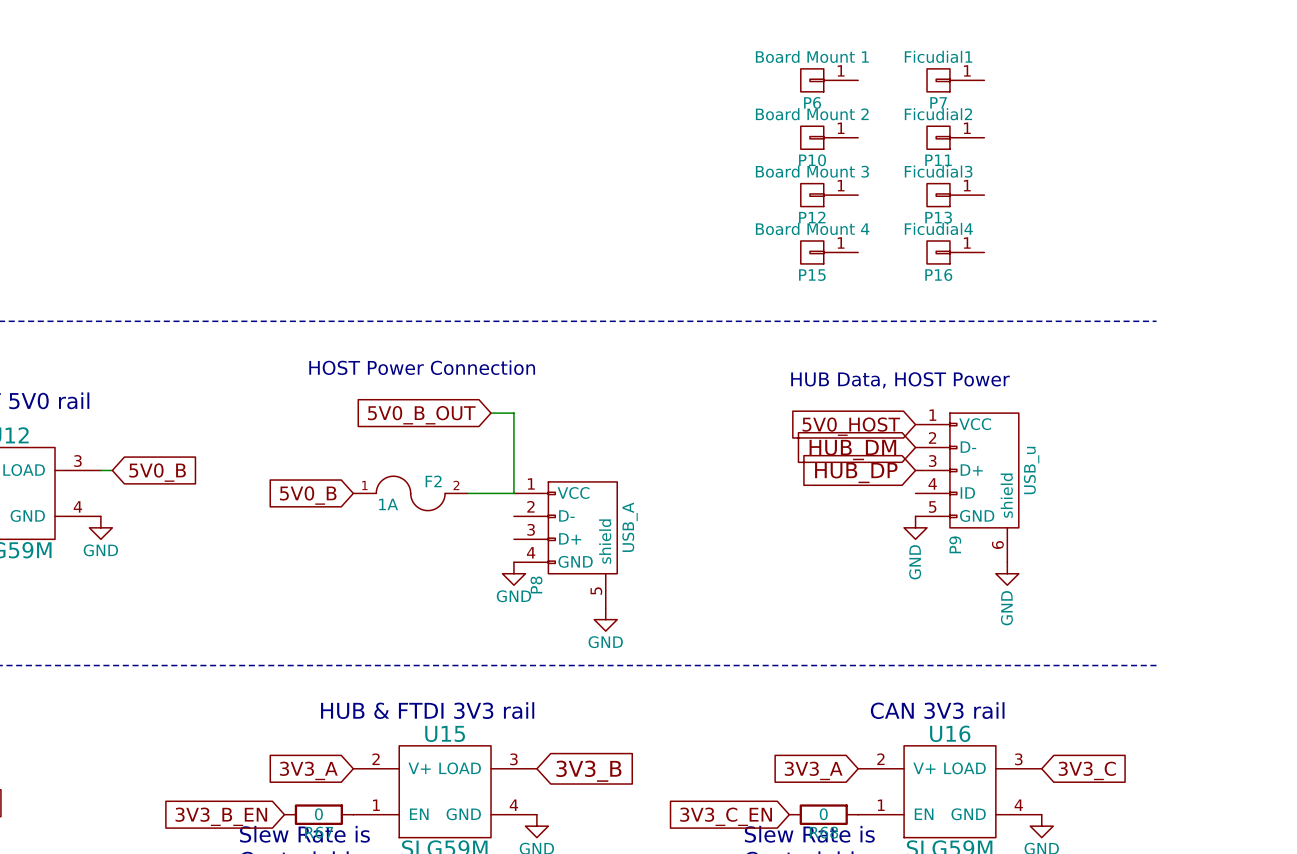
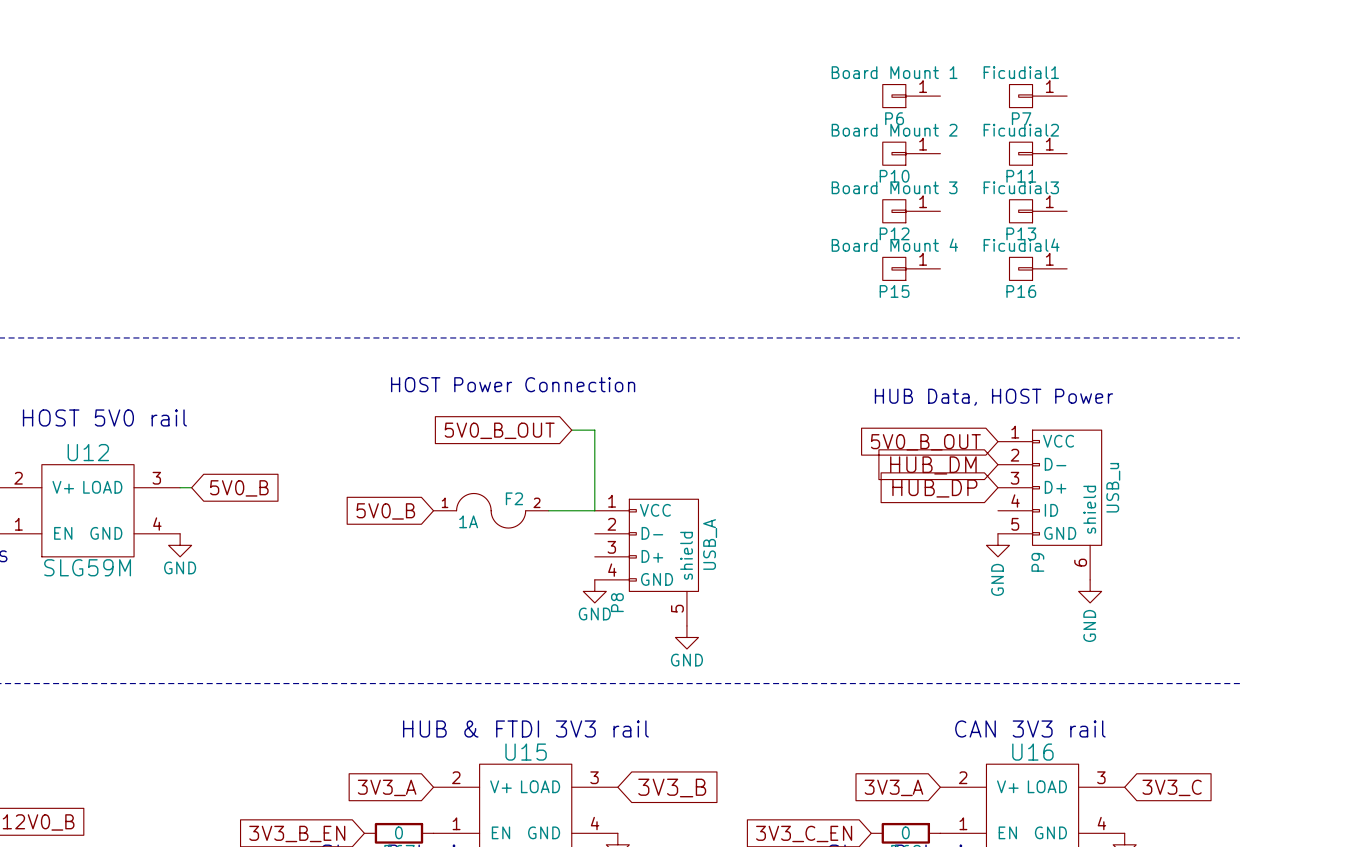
global label: 5V0_HOST (851, 426) -> 5V0_B_OUT (925, 442)

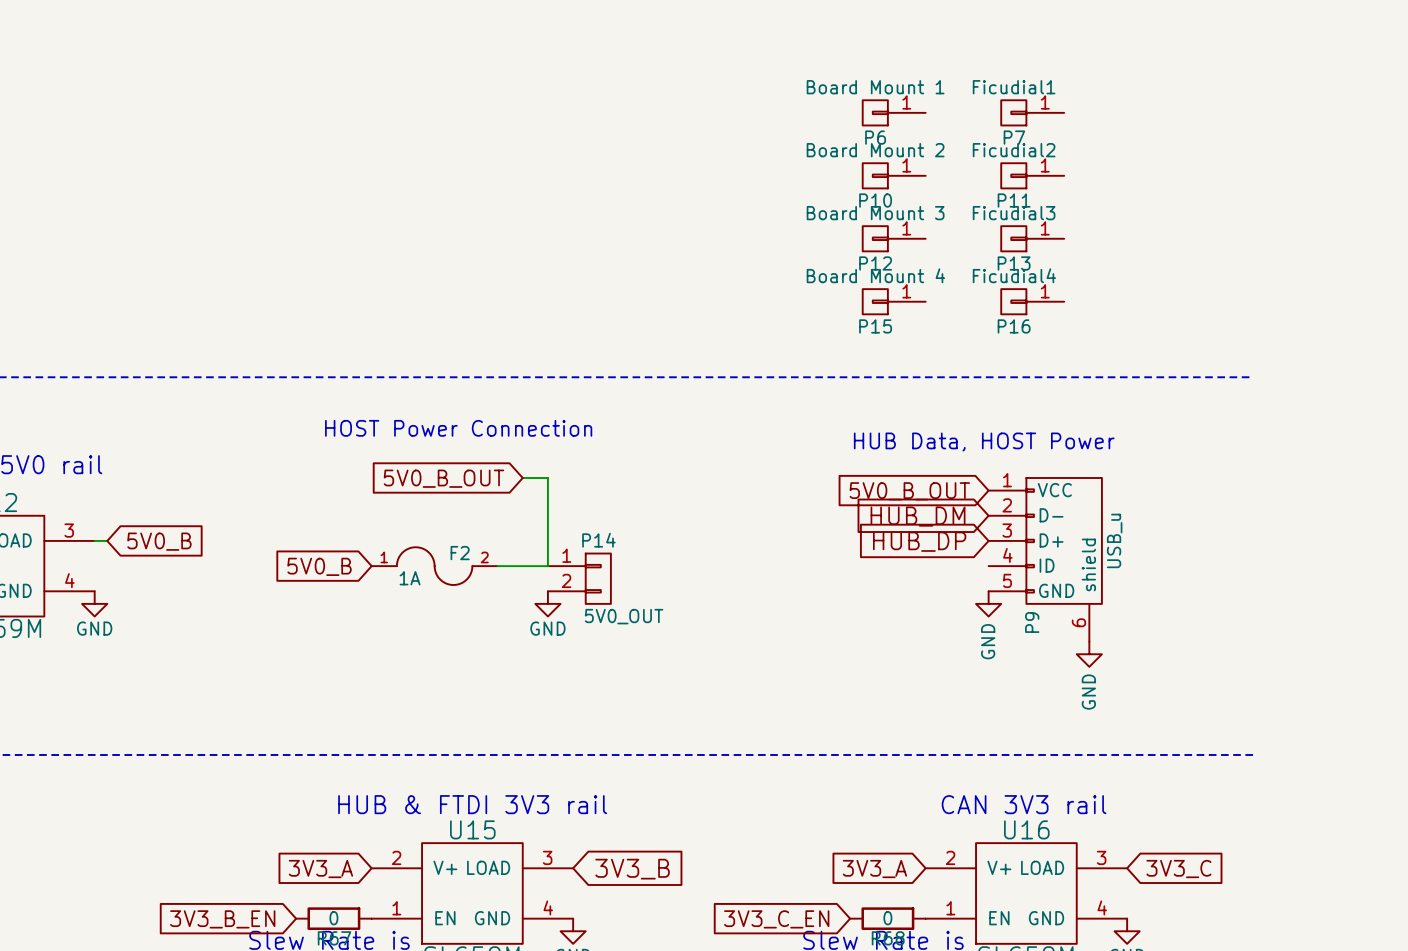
P14: none -> 5V0_OUT (579, 578)
P8: USB_A (646, 562) -> none
power symbol position: GND (594, 591) -> GND (547, 603)
power symbol: GND (686, 637) -> none

